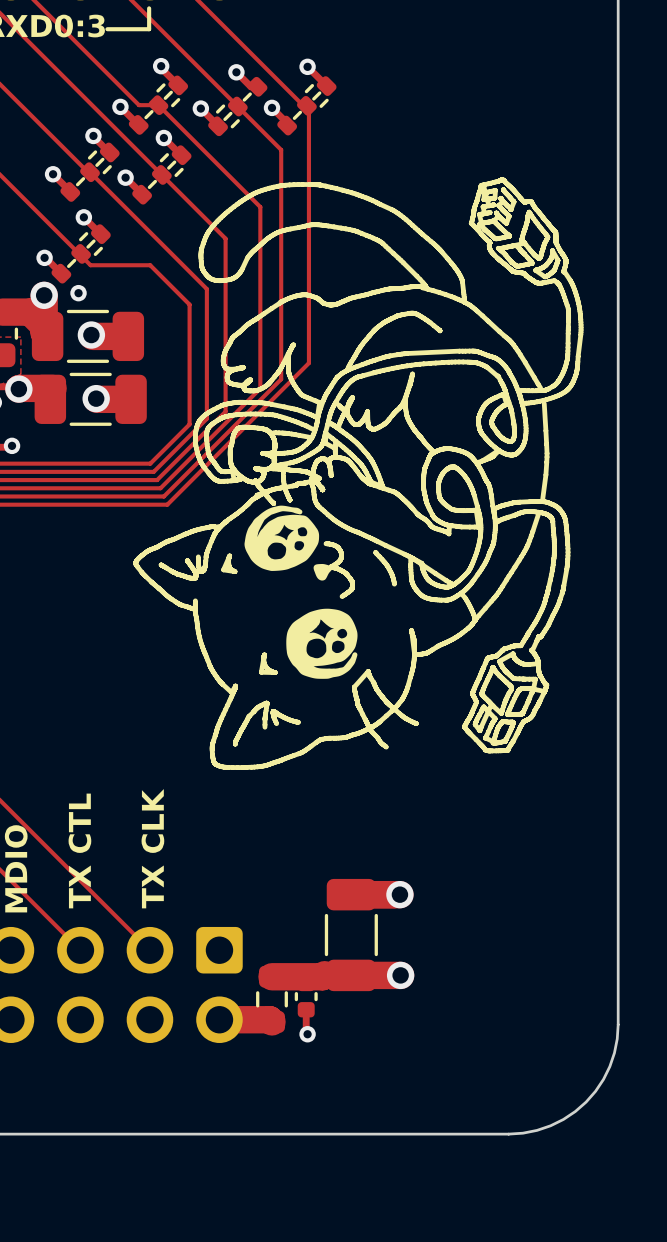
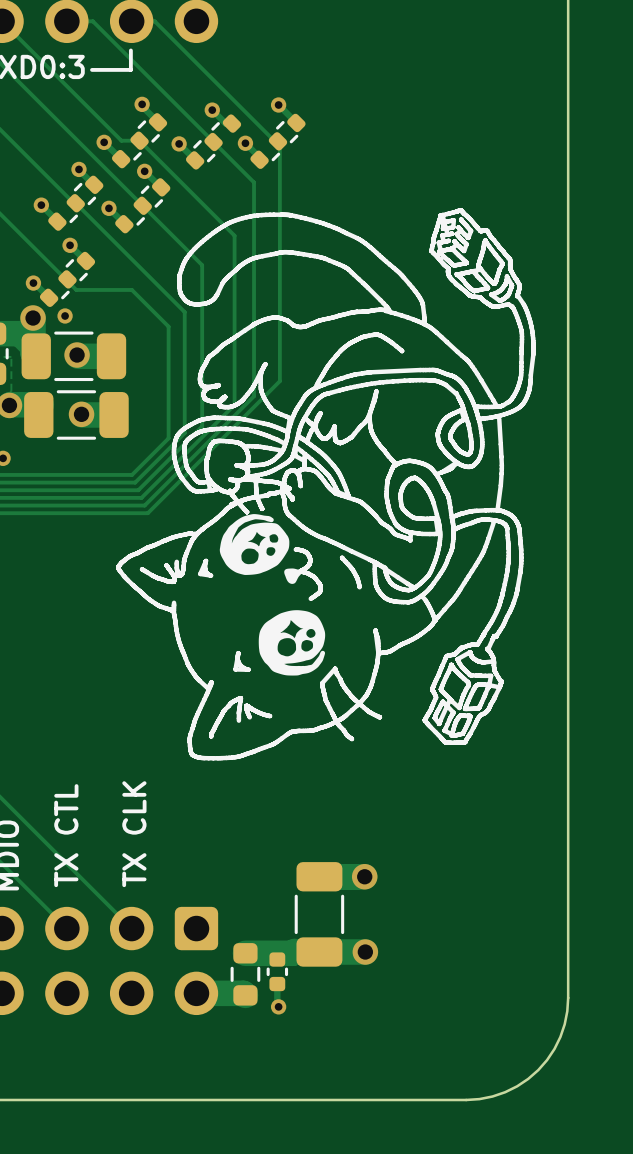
part footprint: [128, 75, 189, 135] -> [111, 113, 168, 169]
part footprint: [208, 76, 268, 137] -> [185, 114, 242, 170]
part footprint: [277, 76, 337, 136] -> [250, 113, 306, 169]
part footprint: [60, 142, 120, 202] -> [48, 175, 104, 231]
part footprint: [132, 145, 192, 205] -> [115, 178, 171, 234]
part footprint: [51, 224, 111, 284] -> [39, 251, 96, 308]

